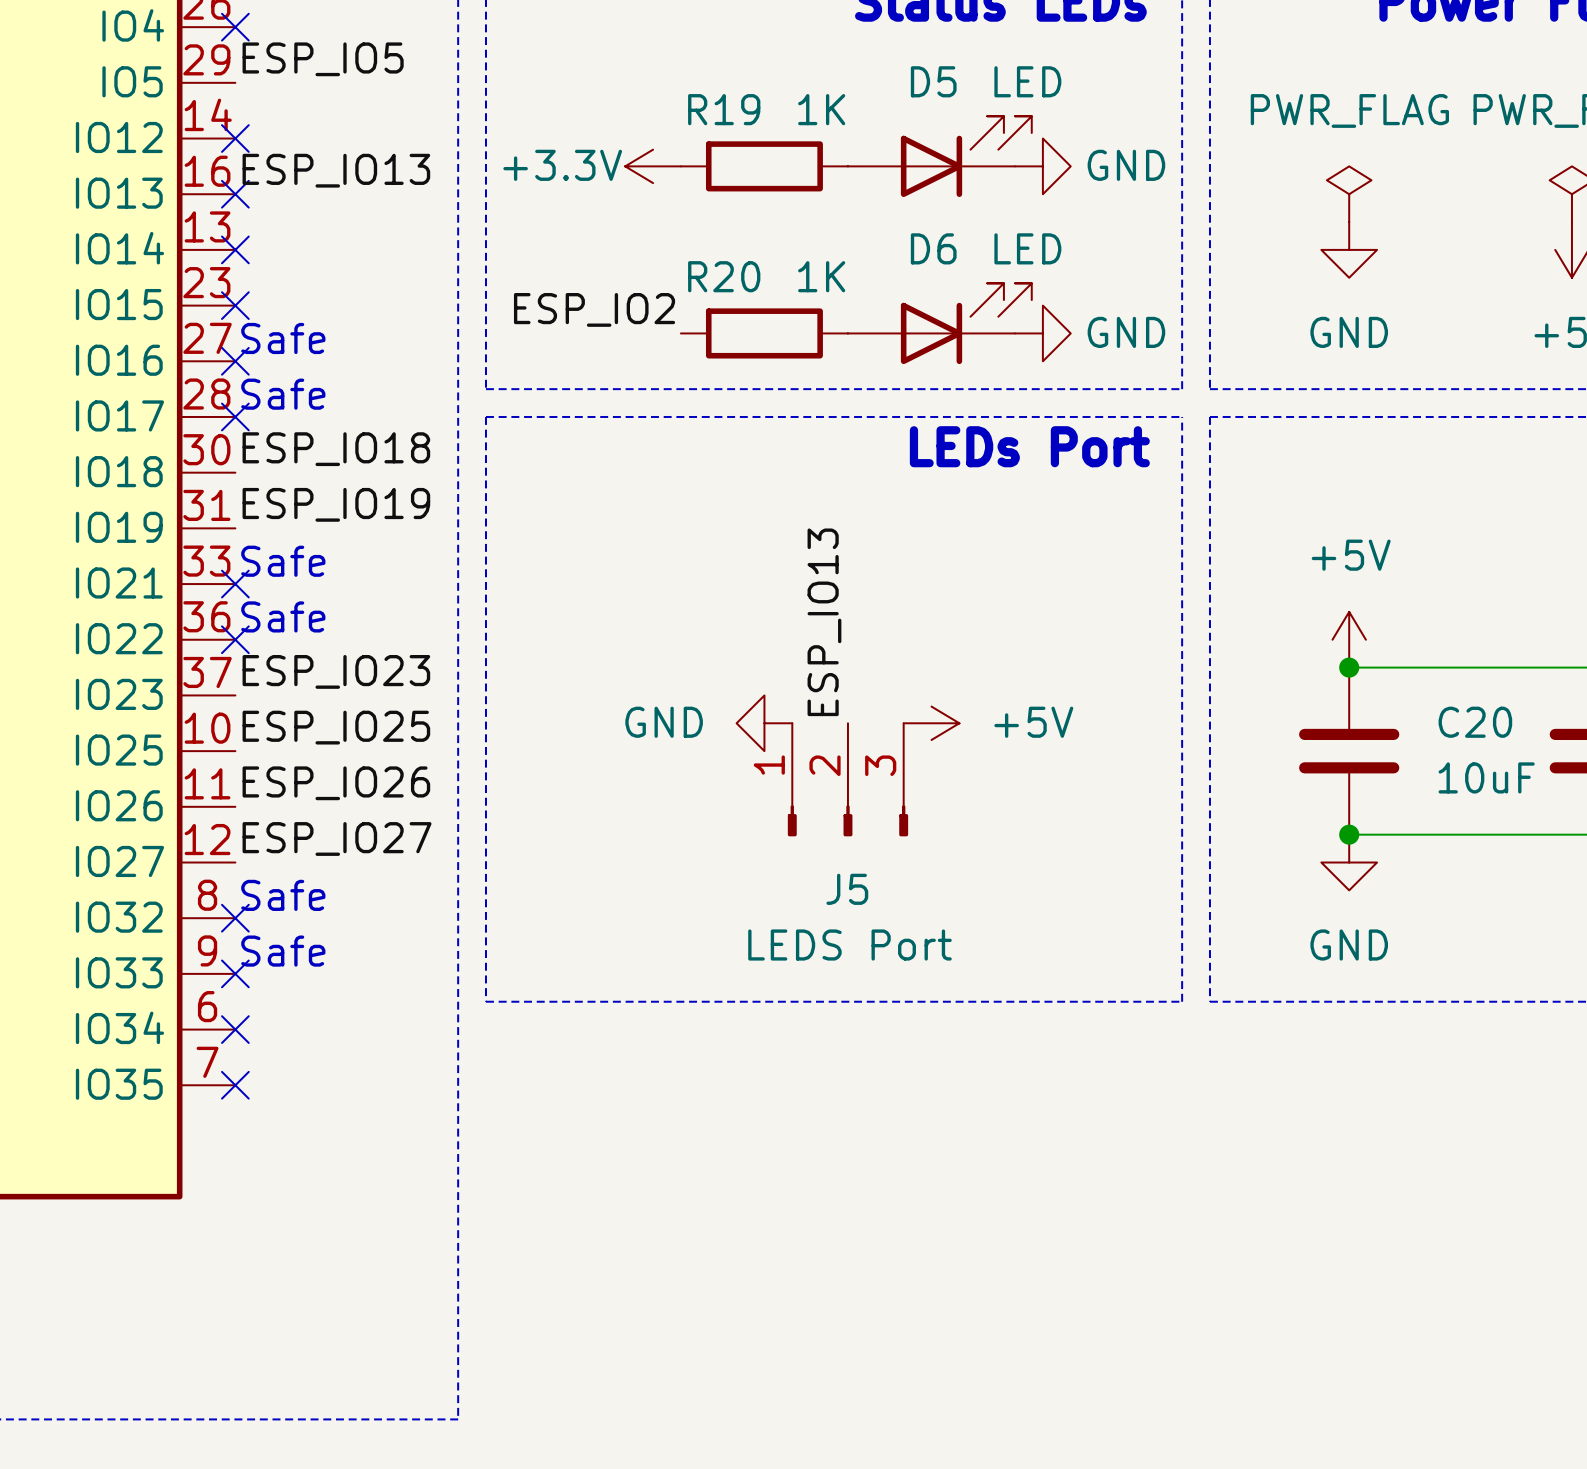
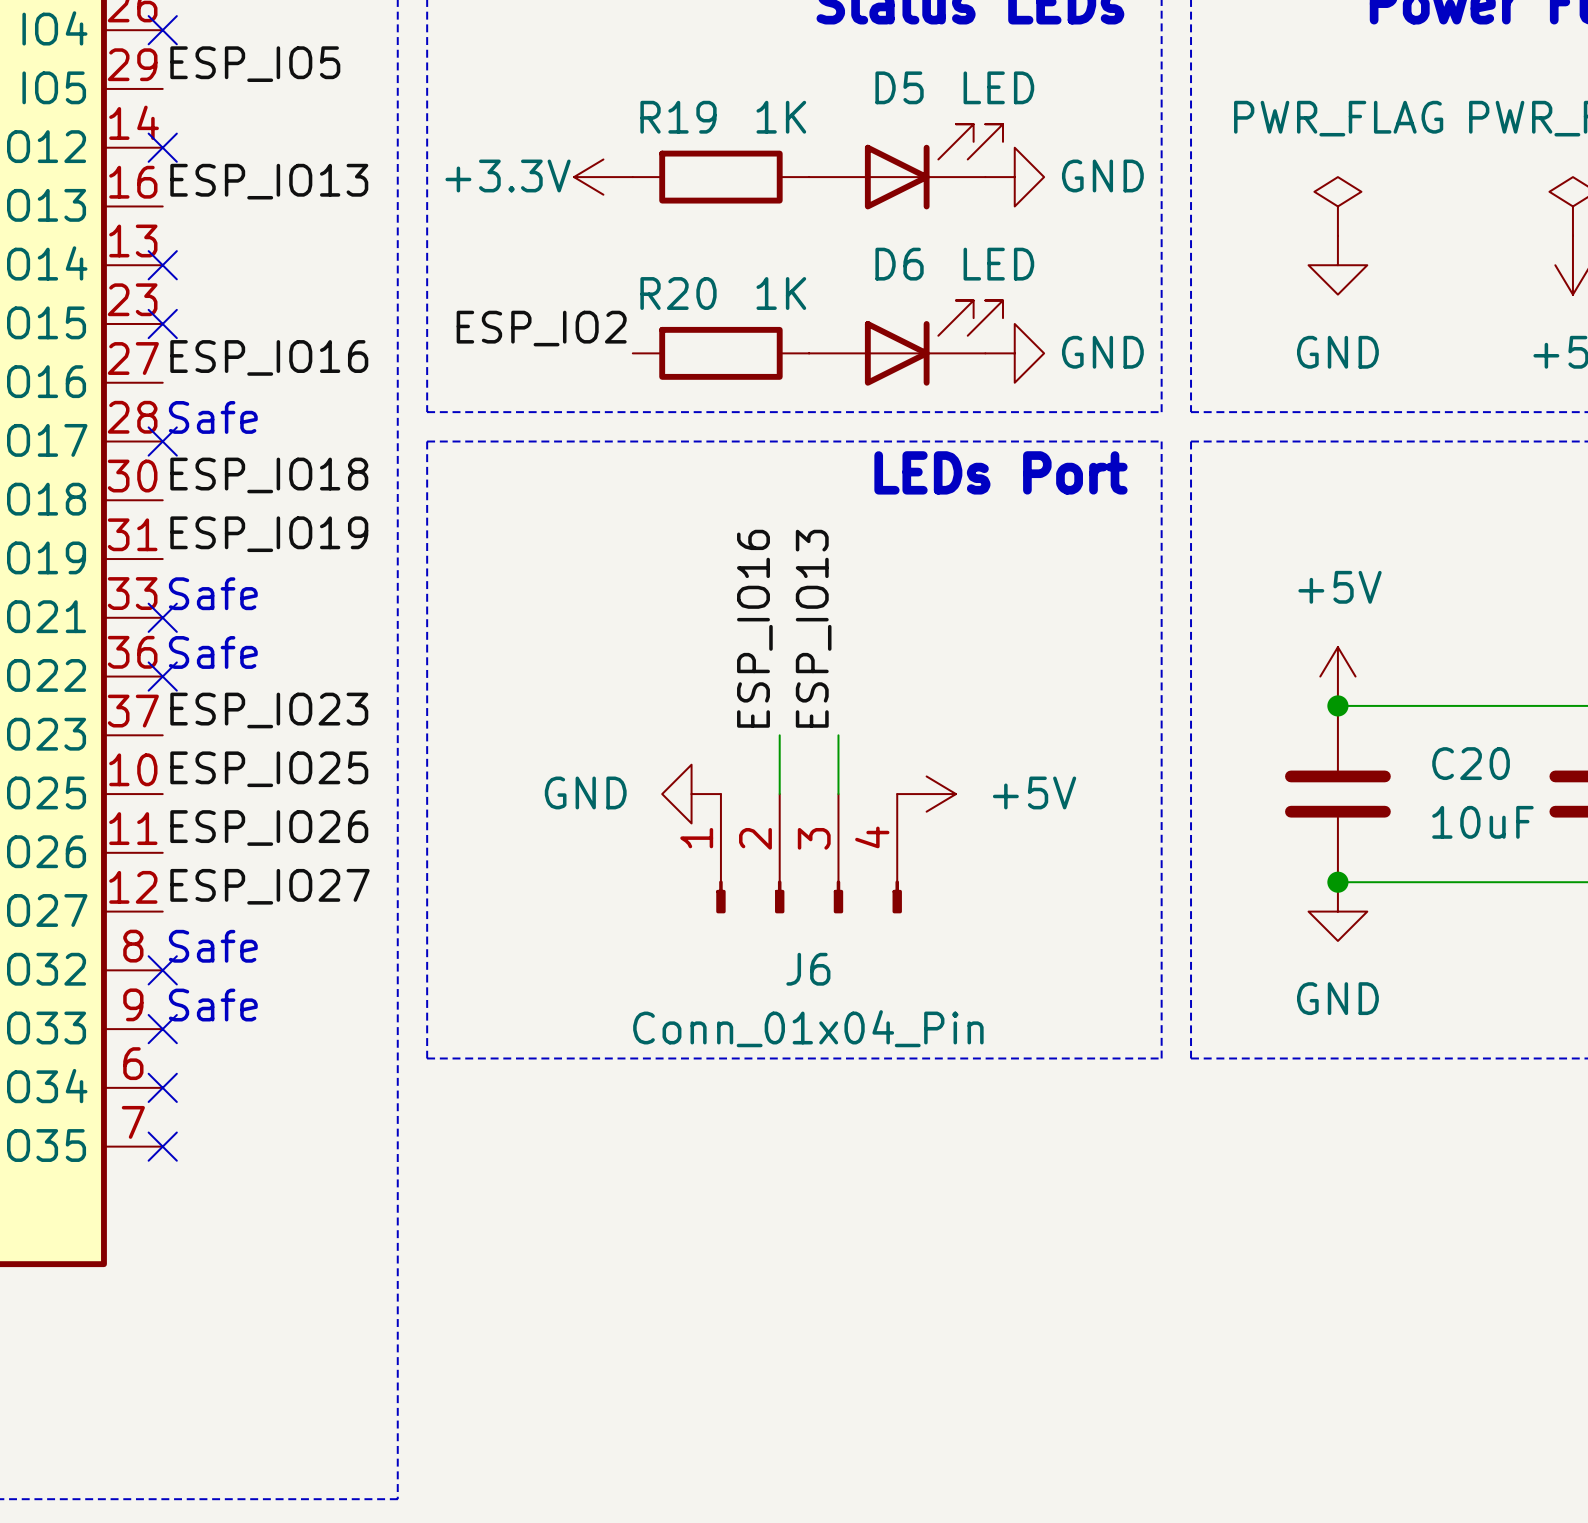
no-connect mark: (235, 194) -> none
label: none -> ESP_IO16 (269, 357)
text: Safe (283, 338) -> none
no-connect mark: (235, 361) -> none
label: none -> ESP_IO16 (754, 628)
label position: ESP_IO13 (824, 622) -> ESP_IO13 (813, 628)
wire: none -> (779, 735) (779, 794)
wire: none -> (838, 735) (838, 794)
power symbol position: GND (764, 723) -> GND (691, 794)
power symbol position: +5V (931, 723) -> +5V (926, 794)
J5: LEDS Port (847, 779) -> none
J6: none -> Conn_01x04_Pin (809, 853)

